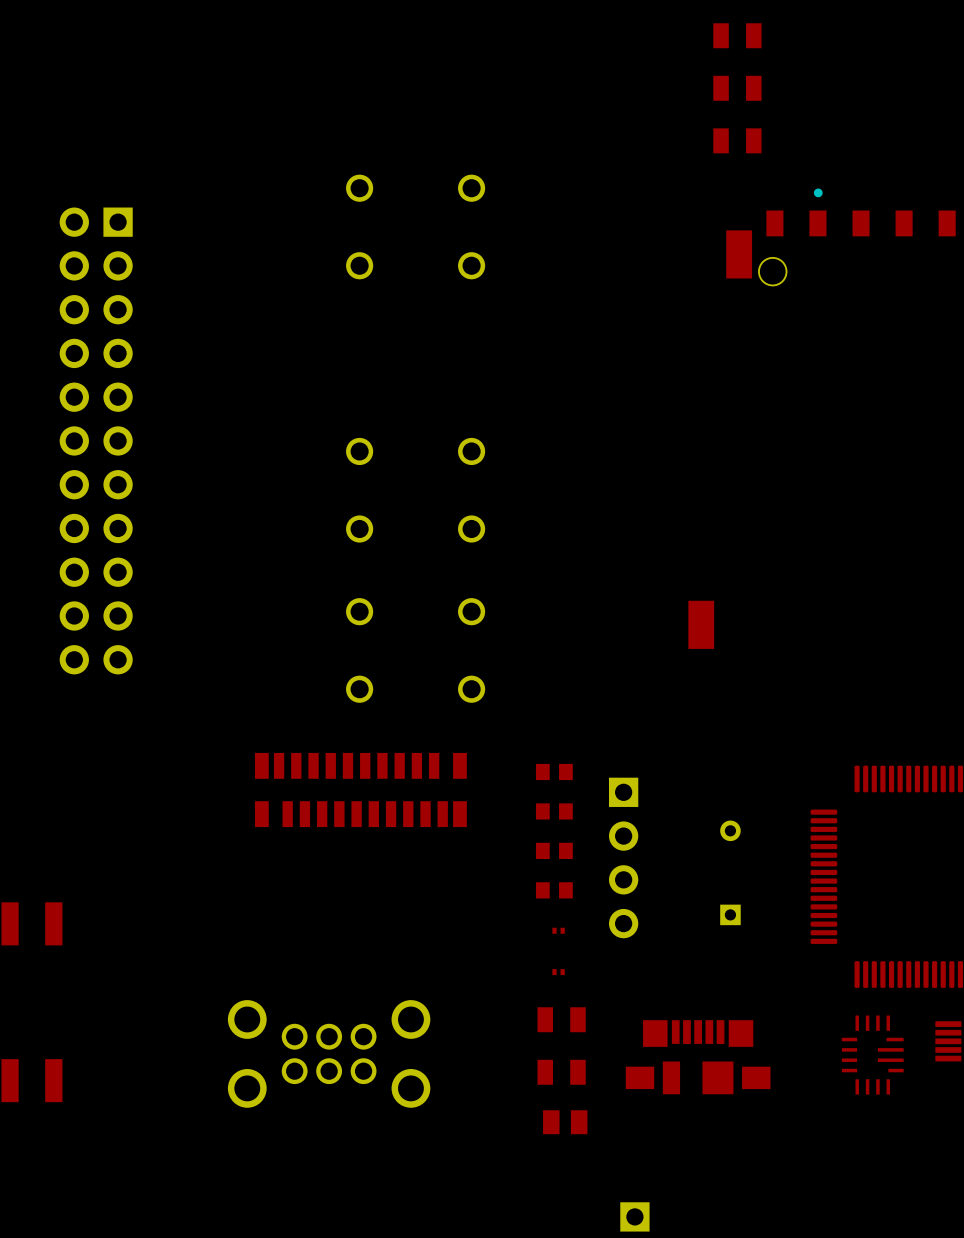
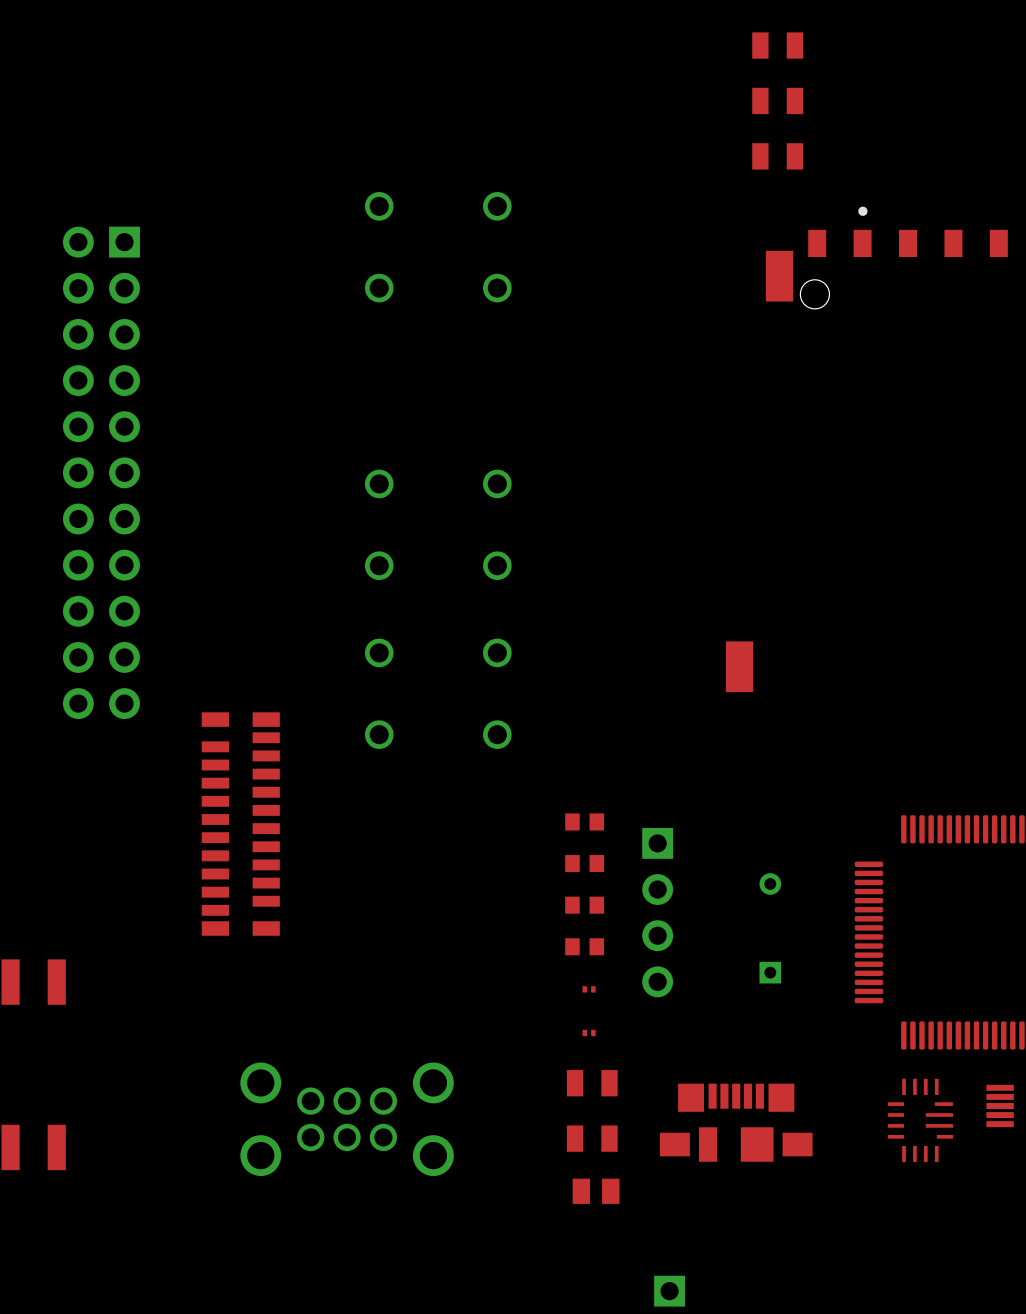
part rotation: 0° (360, 790) -> 90° clockwise (240, 824)
part position: (360, 790) -> (240, 824)

